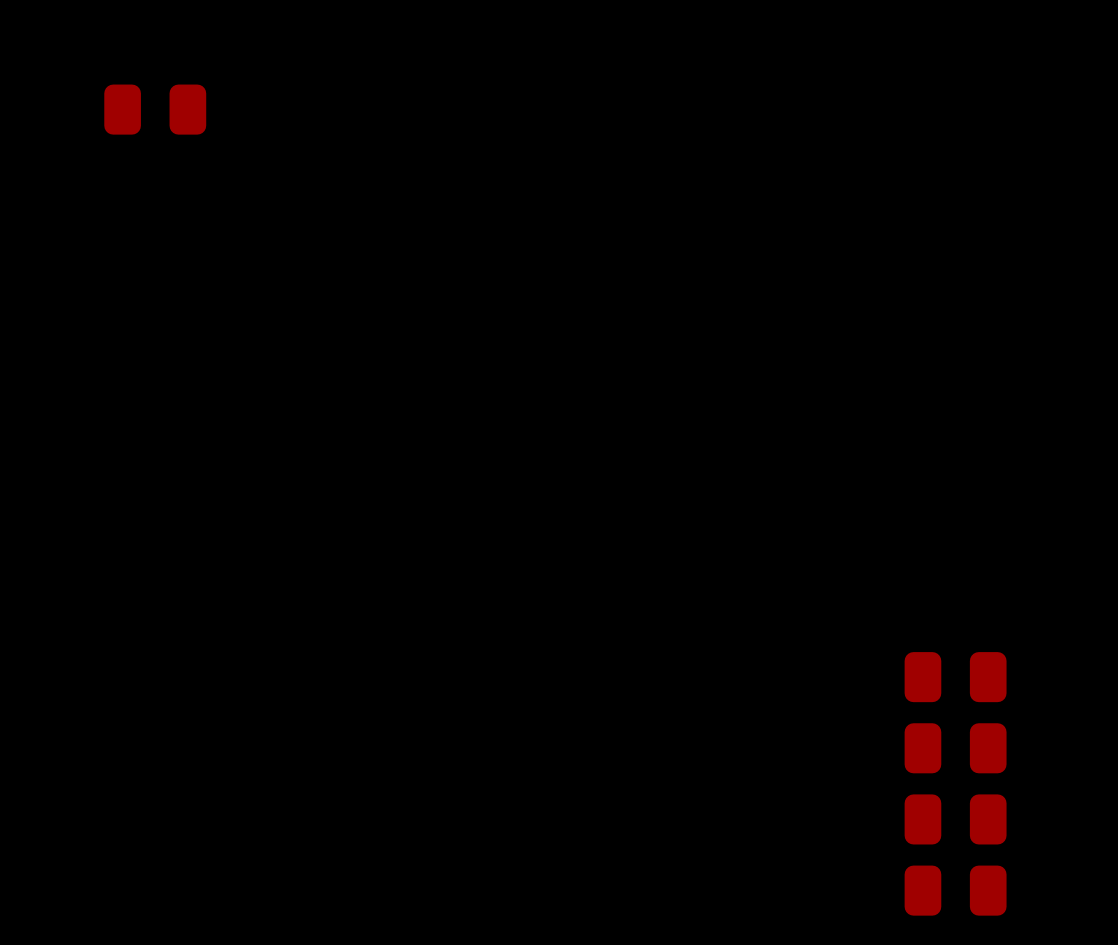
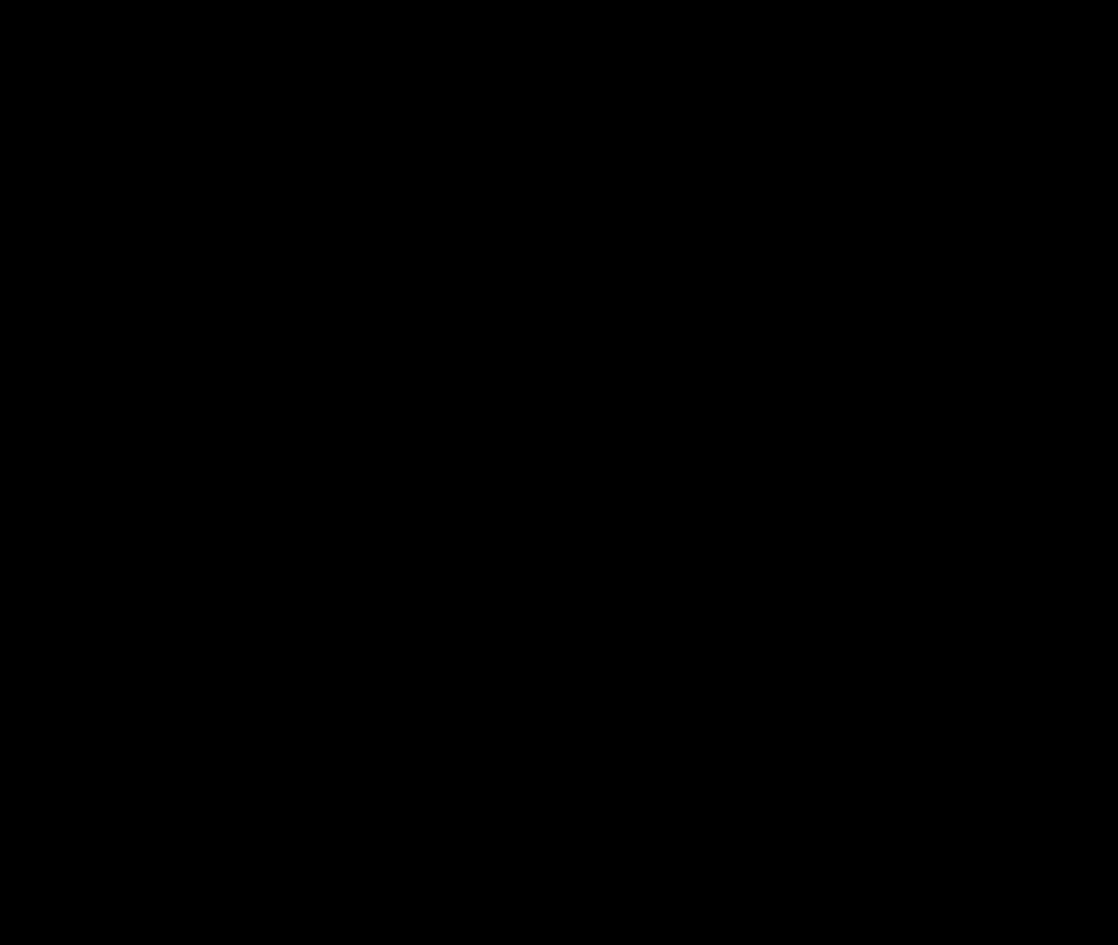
part: (155, 109) -> none
part: (955, 677) -> none
part: (955, 748) -> none
part: (955, 819) -> none
part: (955, 890) -> none

